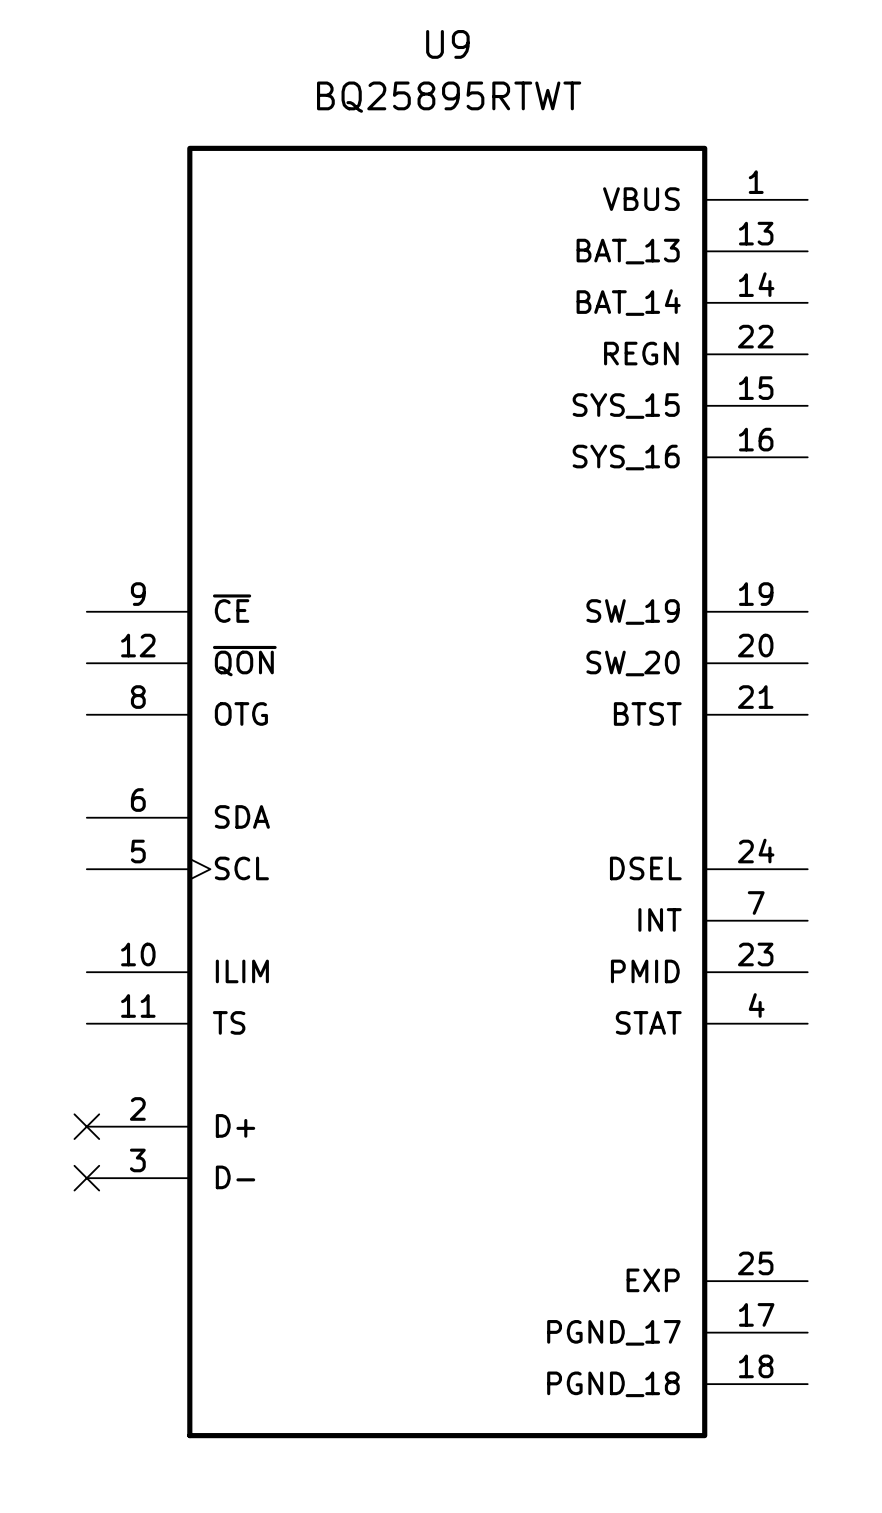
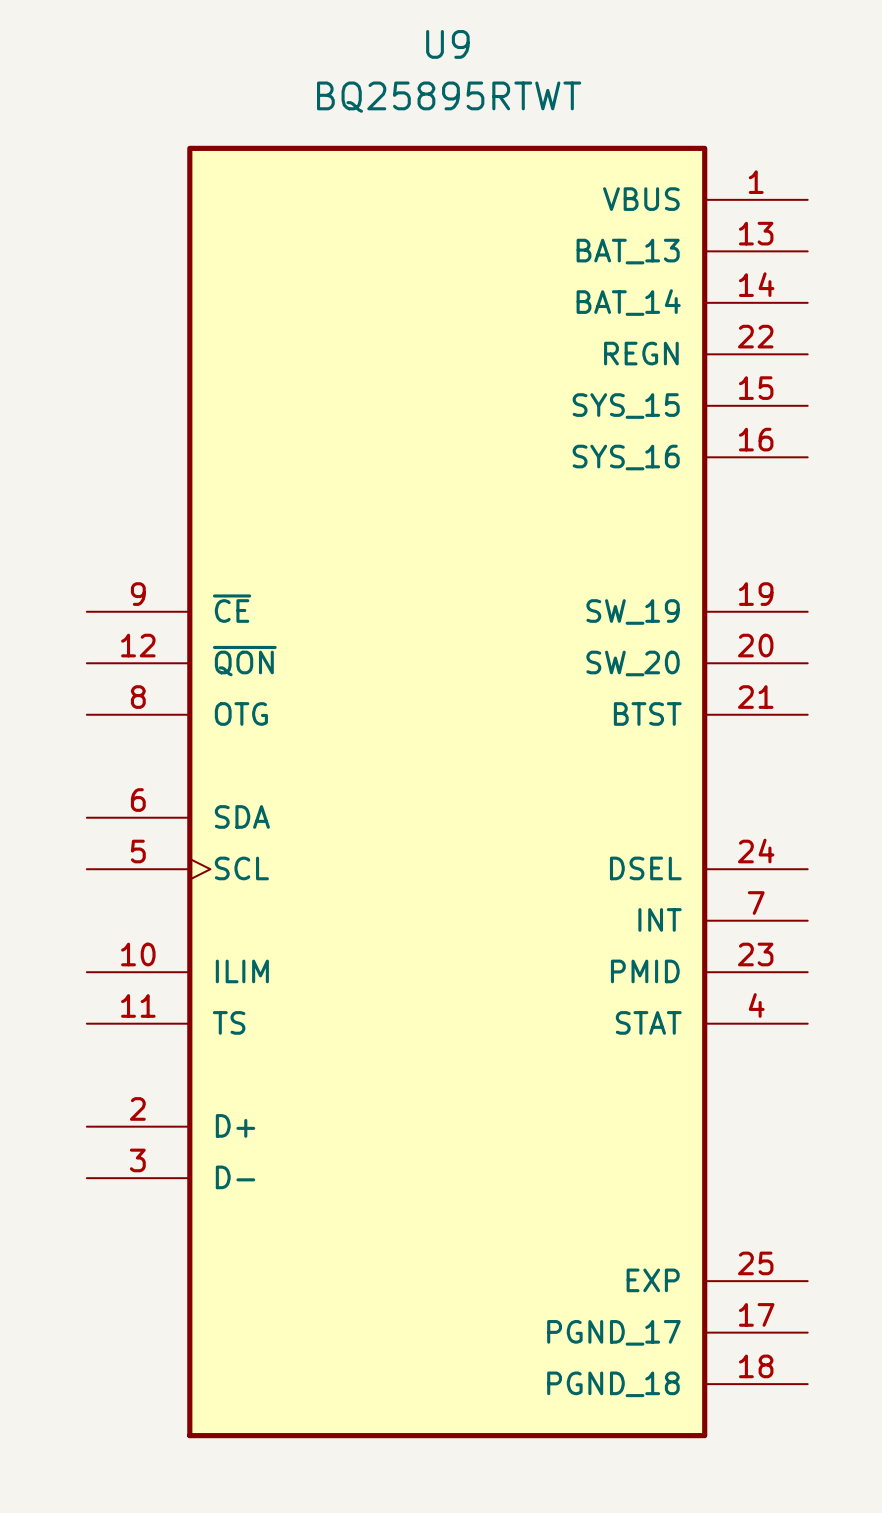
no-connect mark: (86, 1126) -> none
no-connect mark: (86, 1178) -> none

